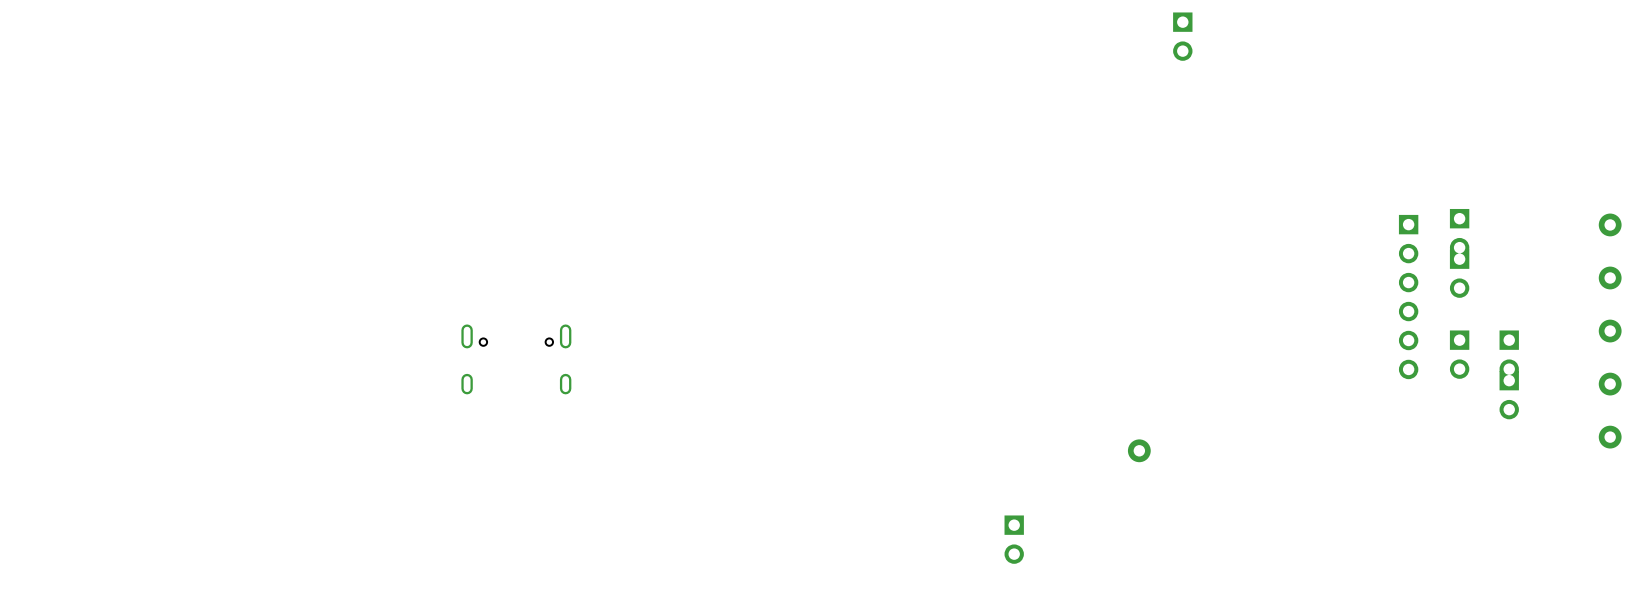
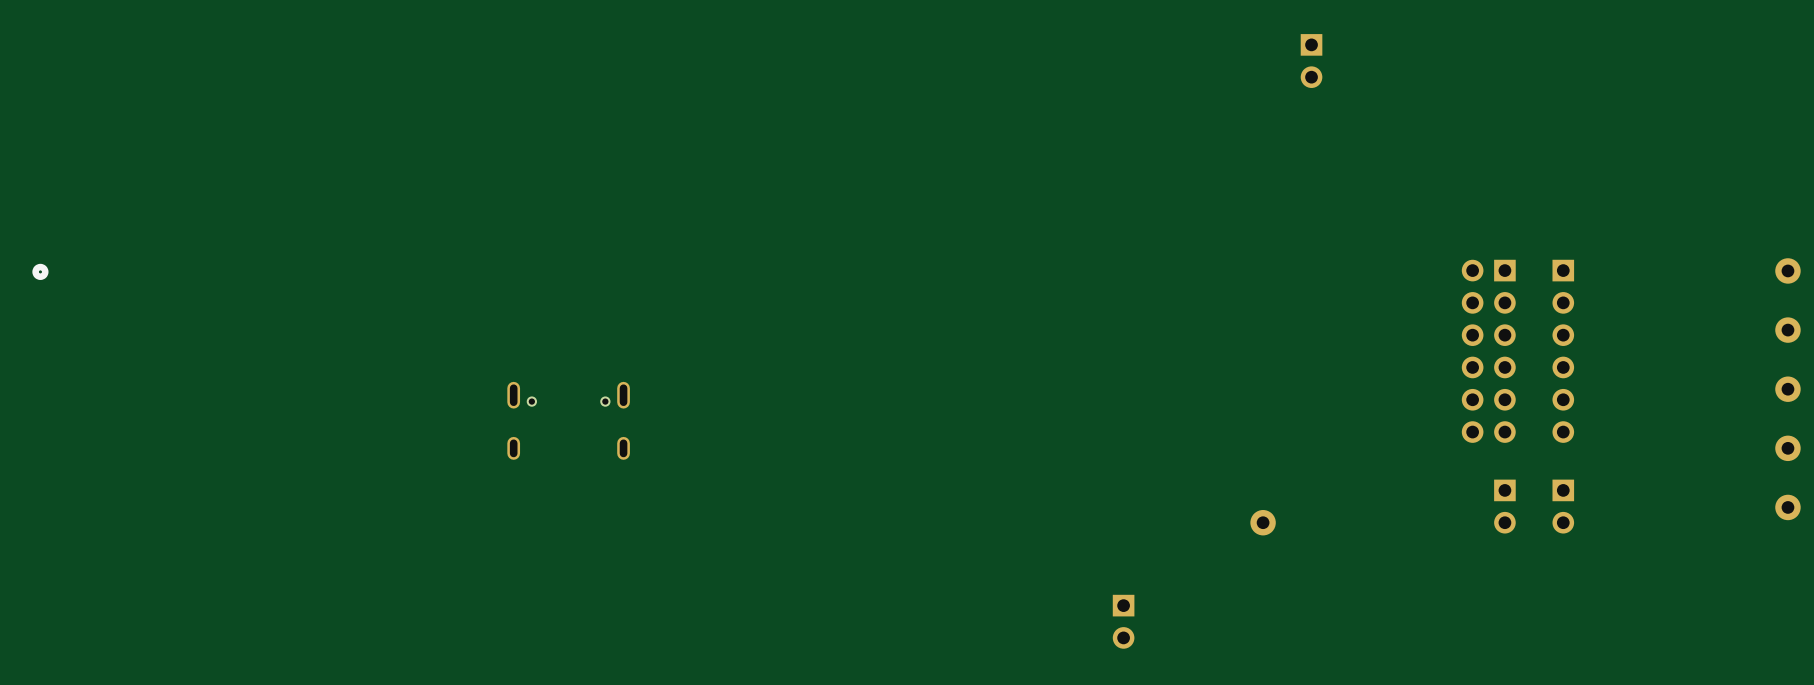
part: none -> (40, 271)
part: (1459, 233) -> none
part: (1459, 273) -> none
part: none -> (1488, 351)
part: (1459, 354) -> none
part: (1509, 354) -> none
part: (1509, 395) -> none
part: none -> (1504, 506)
part: none -> (1563, 506)

